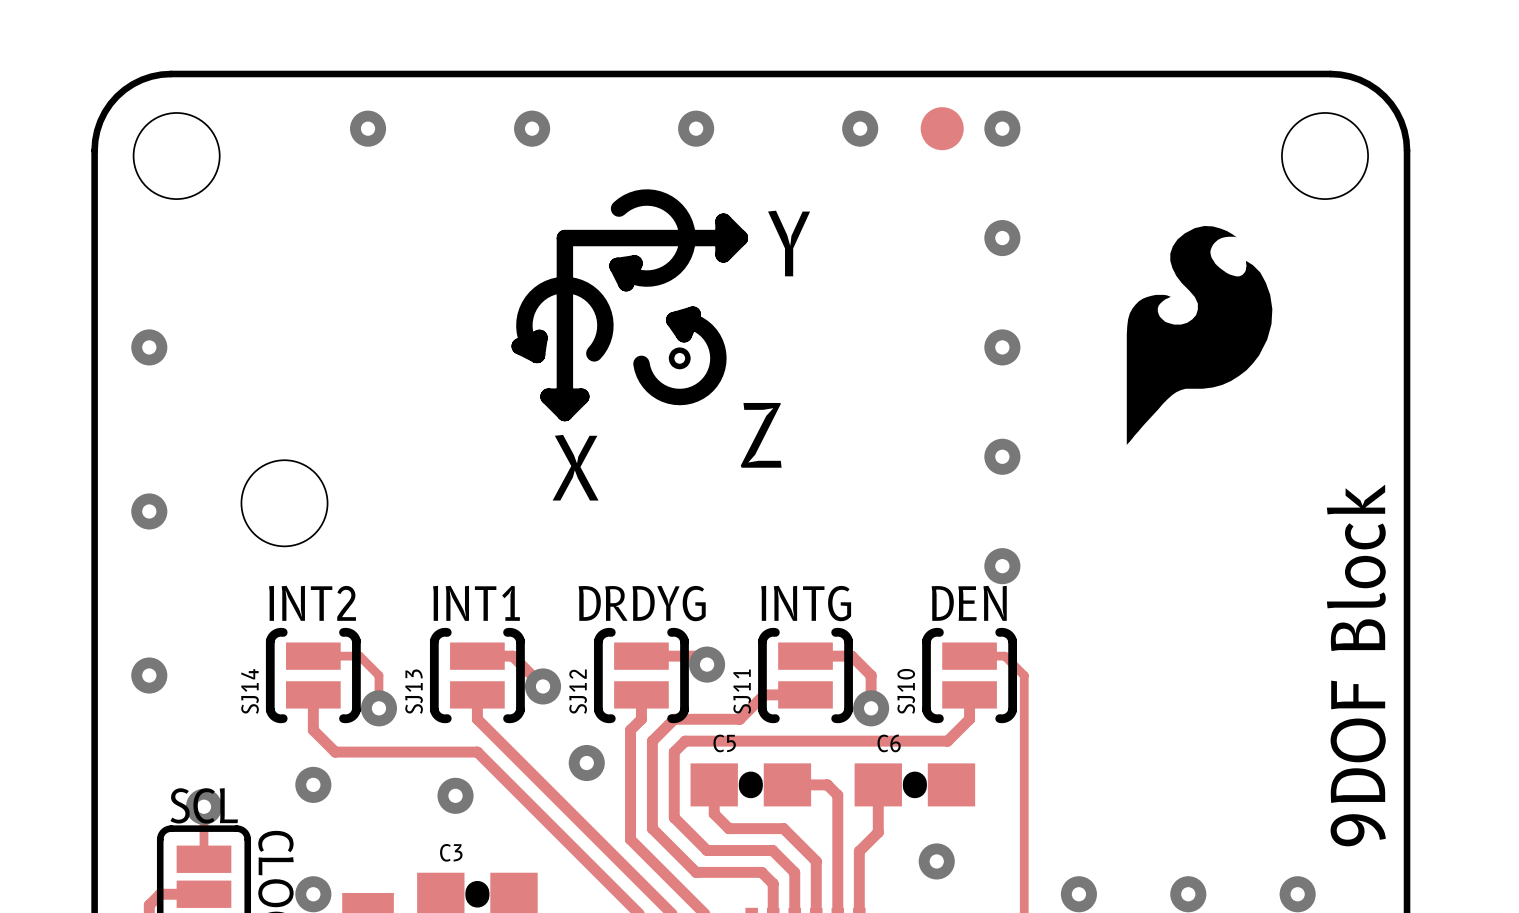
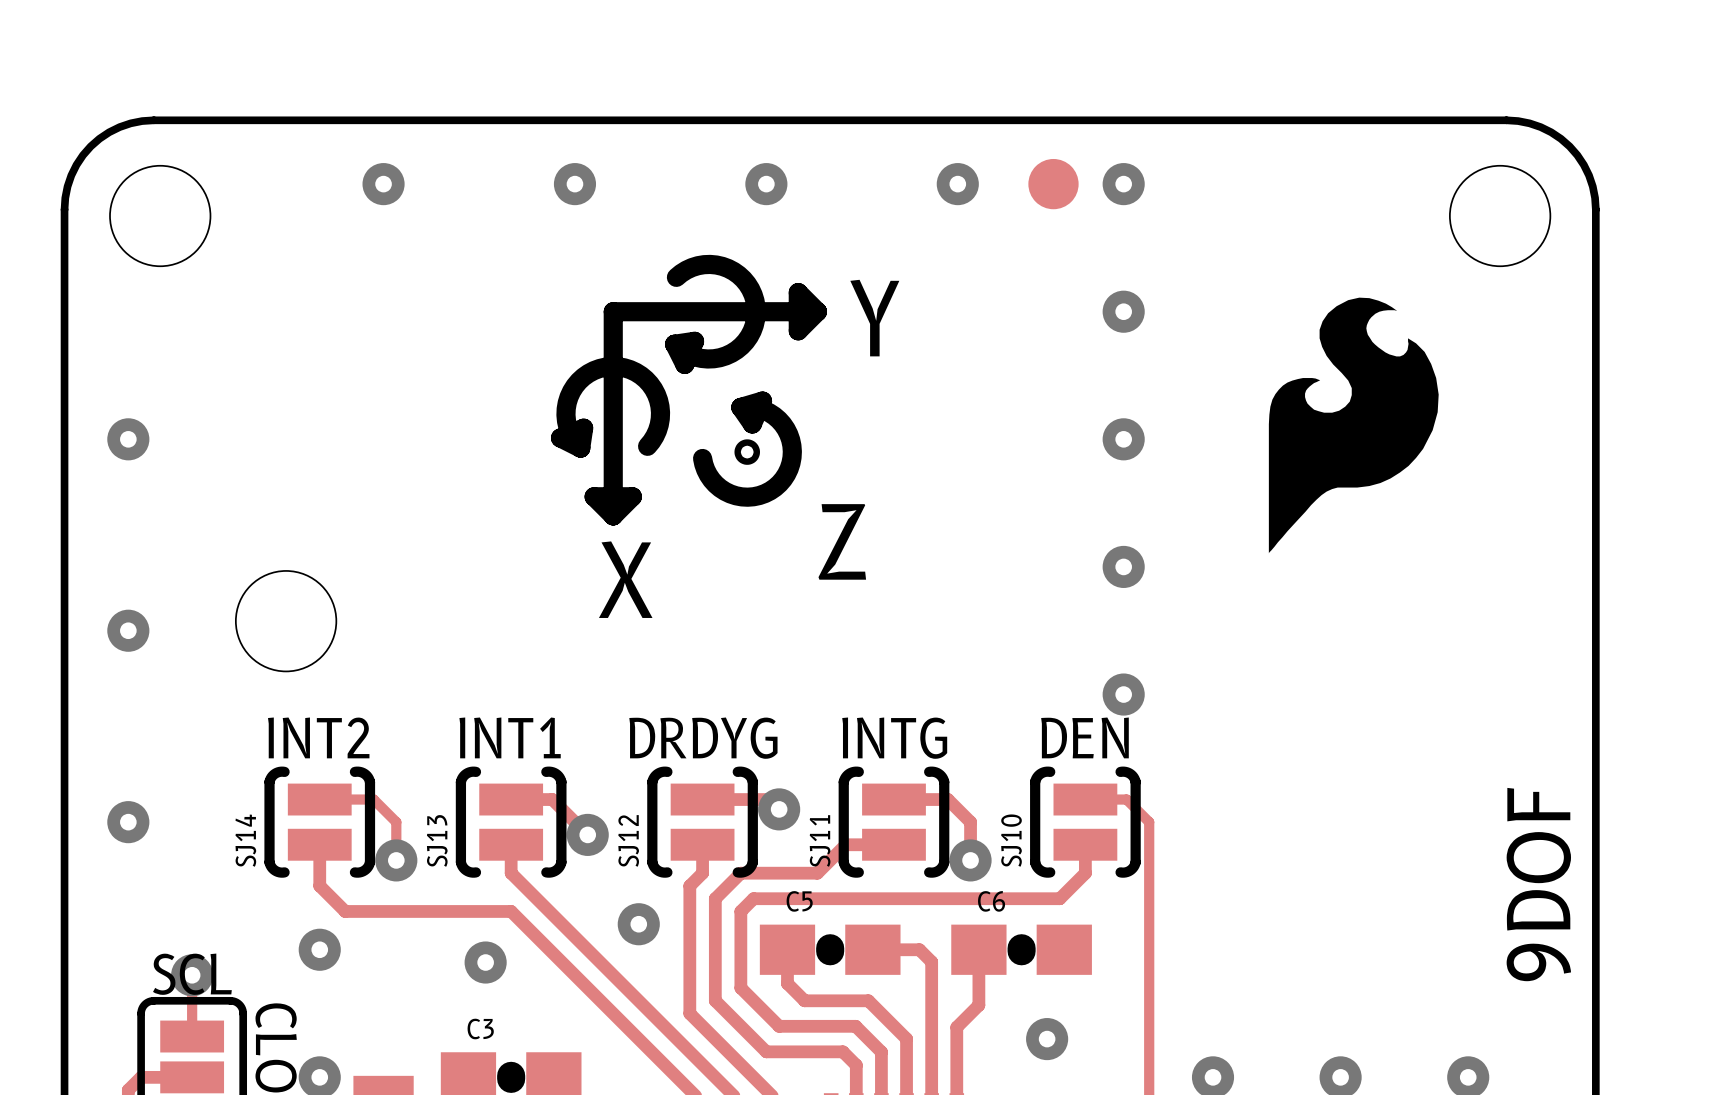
text: 9DOF Block (1356, 665) -> none
text: none -> 9DOF (1538, 884)

